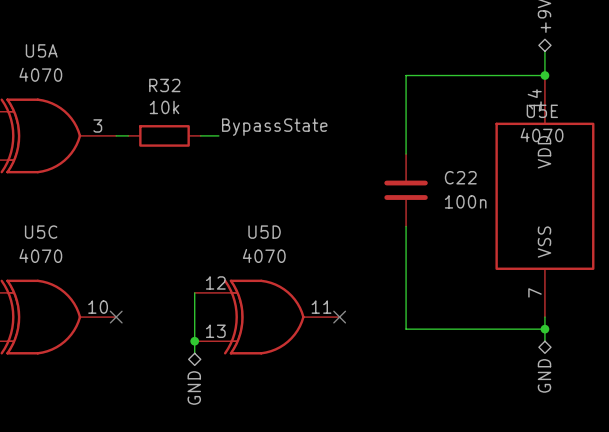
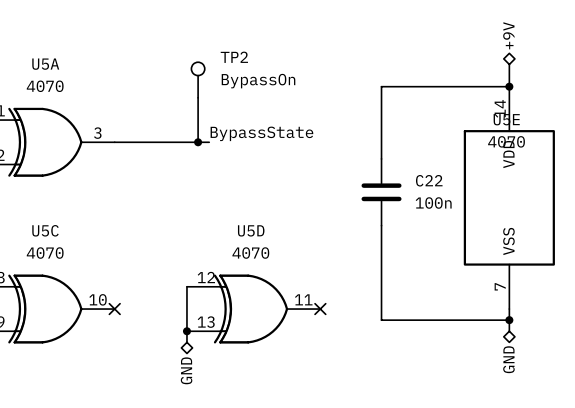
TP2: none -> BypassOn (198, 80)
wire: none -> (198, 97) (198, 142)
wire: none -> (125, 142) (192, 142)
R32: 10k (164, 135) -> none
junction: none -> (198, 142)

